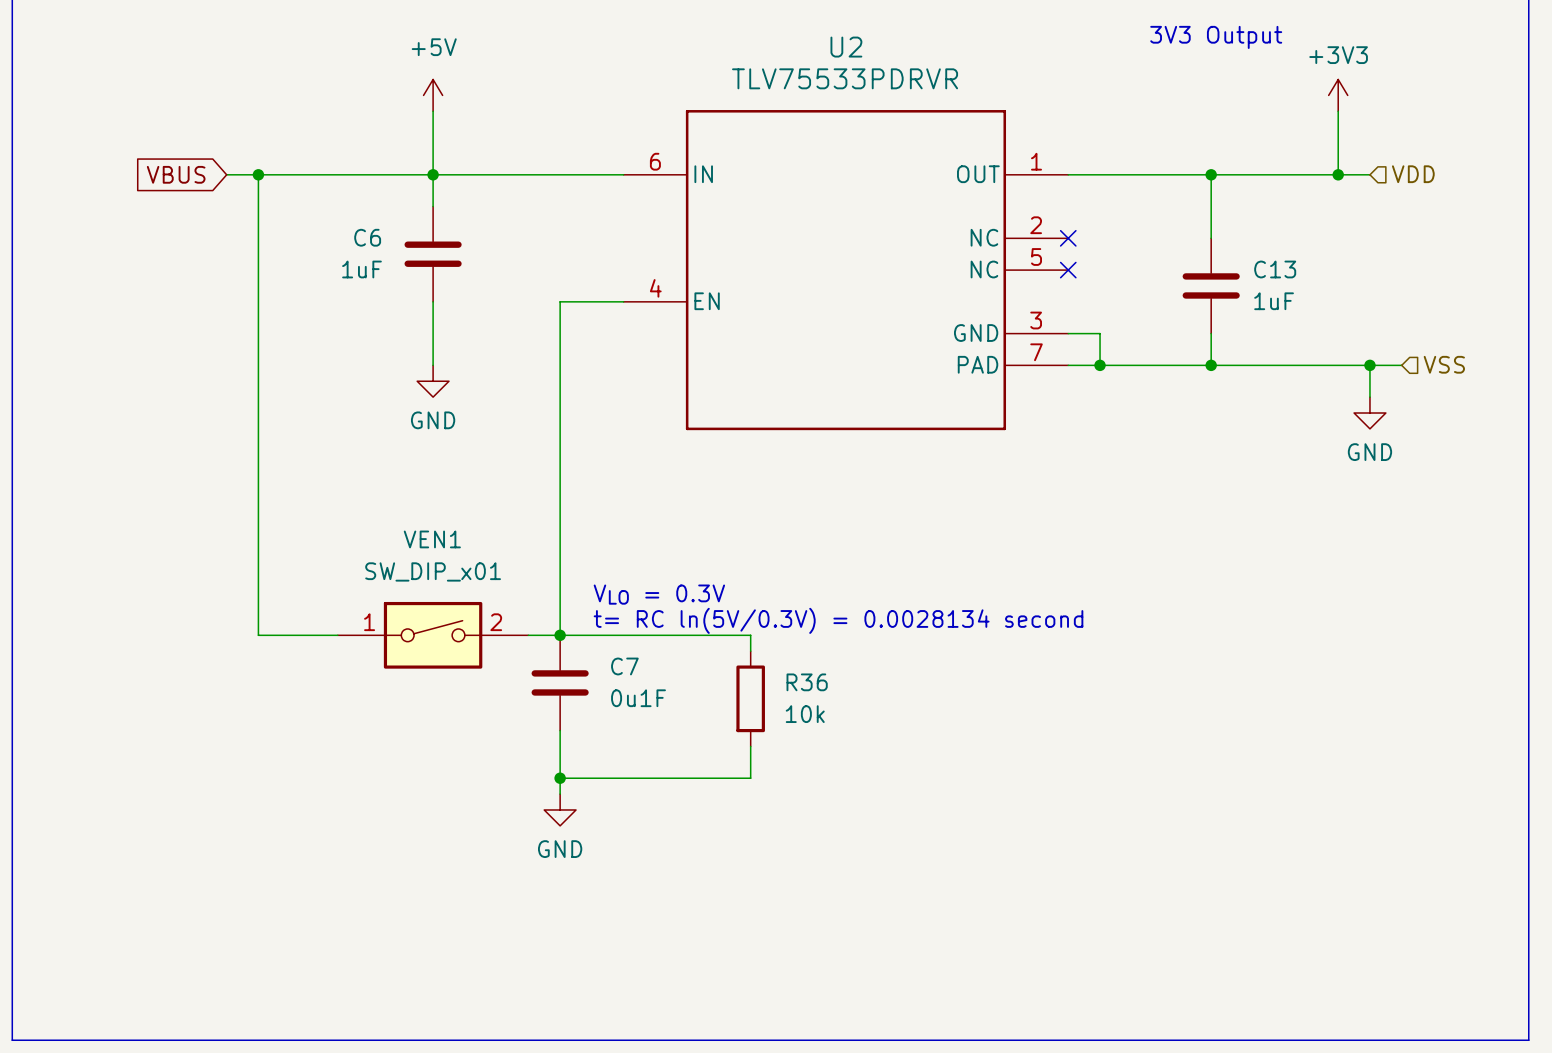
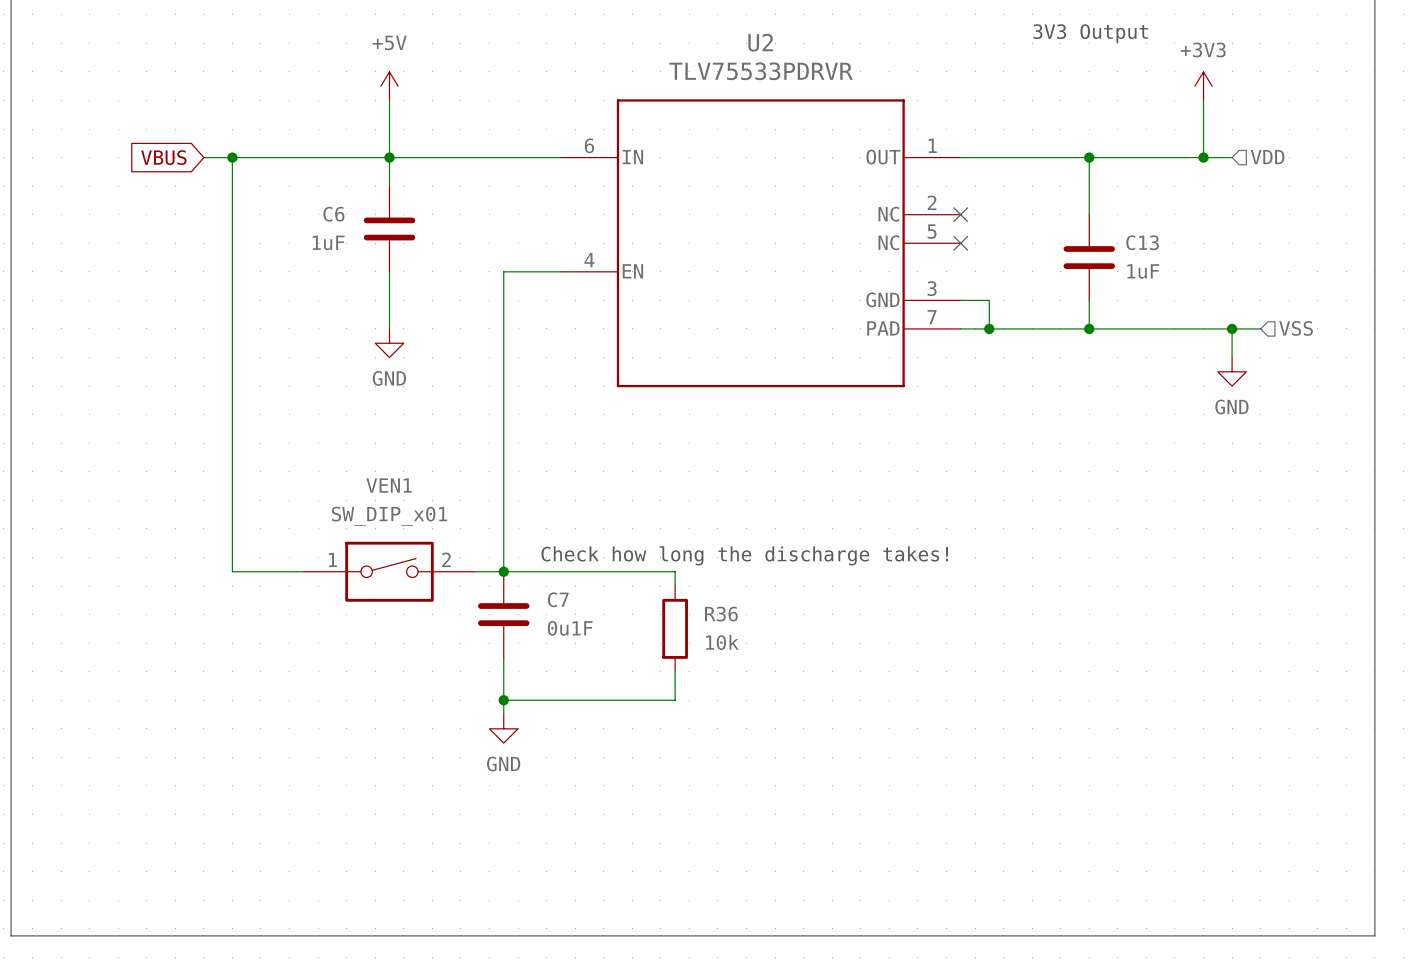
text: VLO = 0.3V (659, 594) -> none
text: none -> Check how long the discharge takes! (744, 555)
text: t= RC ln(5V/0.3V) = 0.0028134 second (838, 620) -> none

